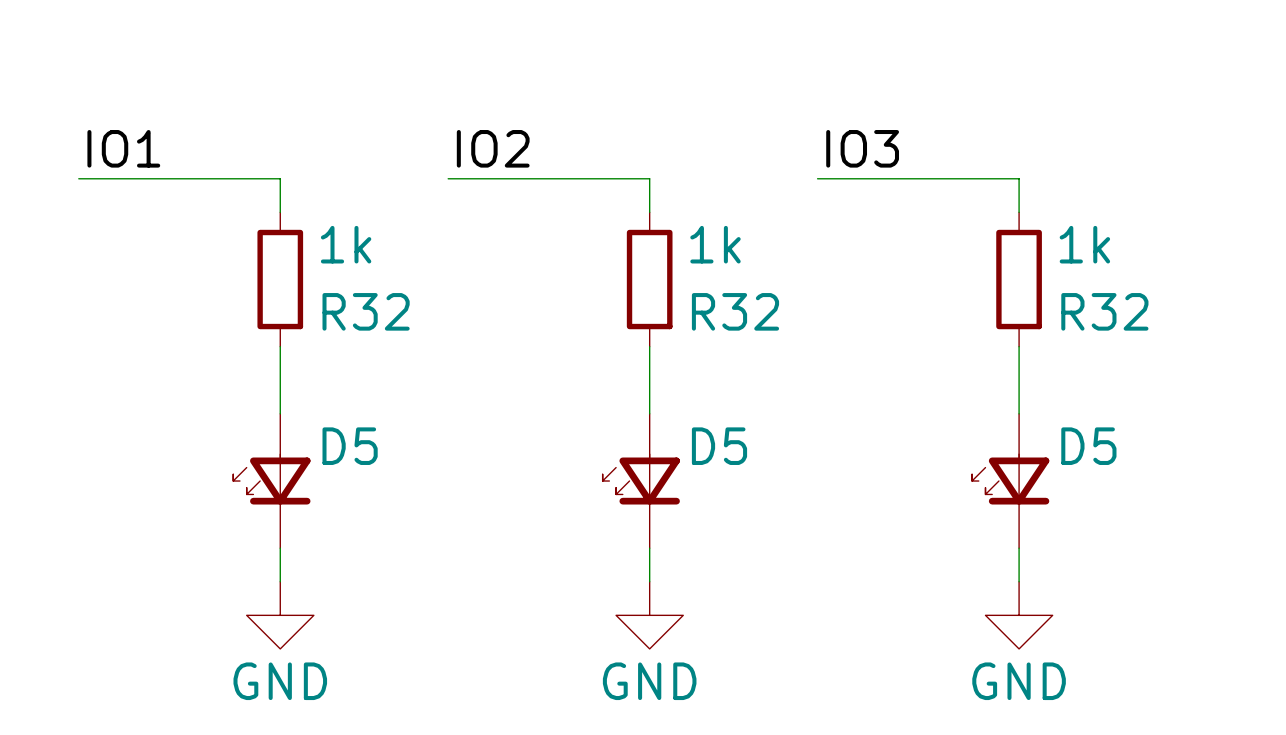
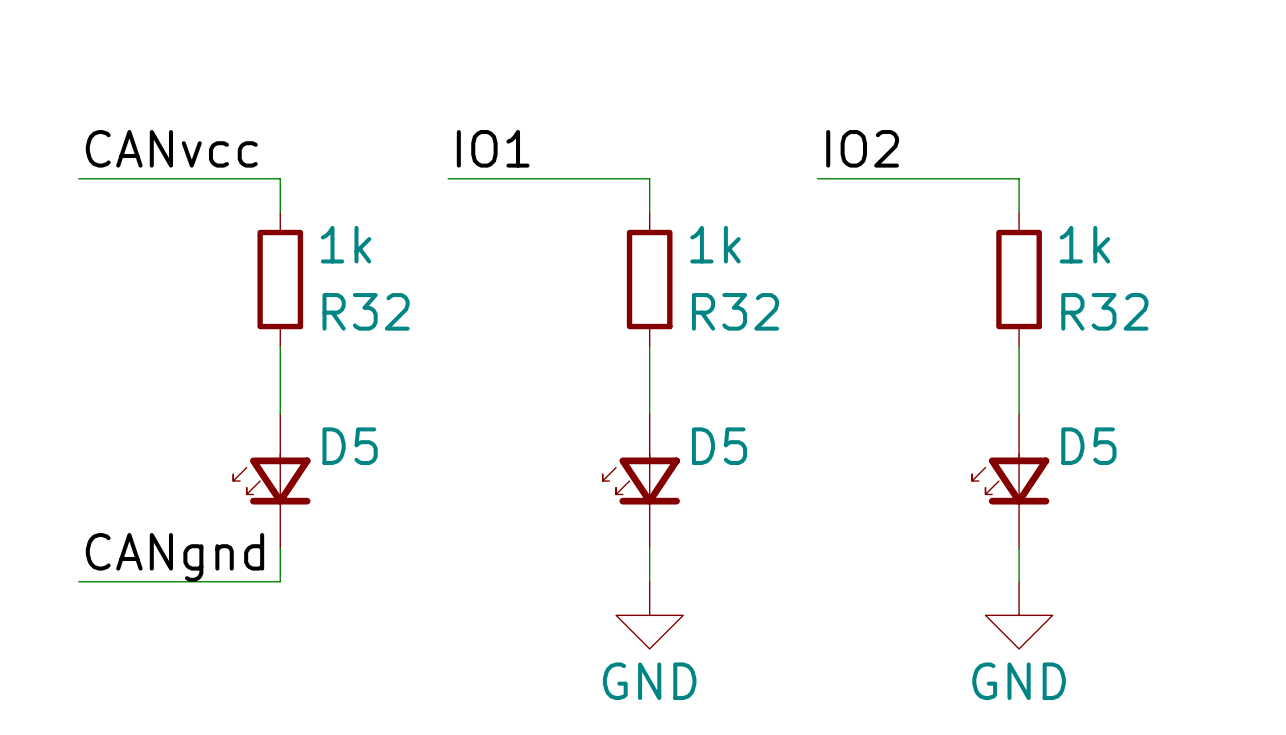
label: IO1 (123, 148) -> CANvcc (171, 148)
label: IO2 (493, 148) -> IO1 (493, 148)
label: IO3 (862, 148) -> IO2 (862, 148)
label: none -> CANgnd (174, 557)
wire: none -> (78, 581) (280, 581)
power symbol: GND (280, 615) -> none

